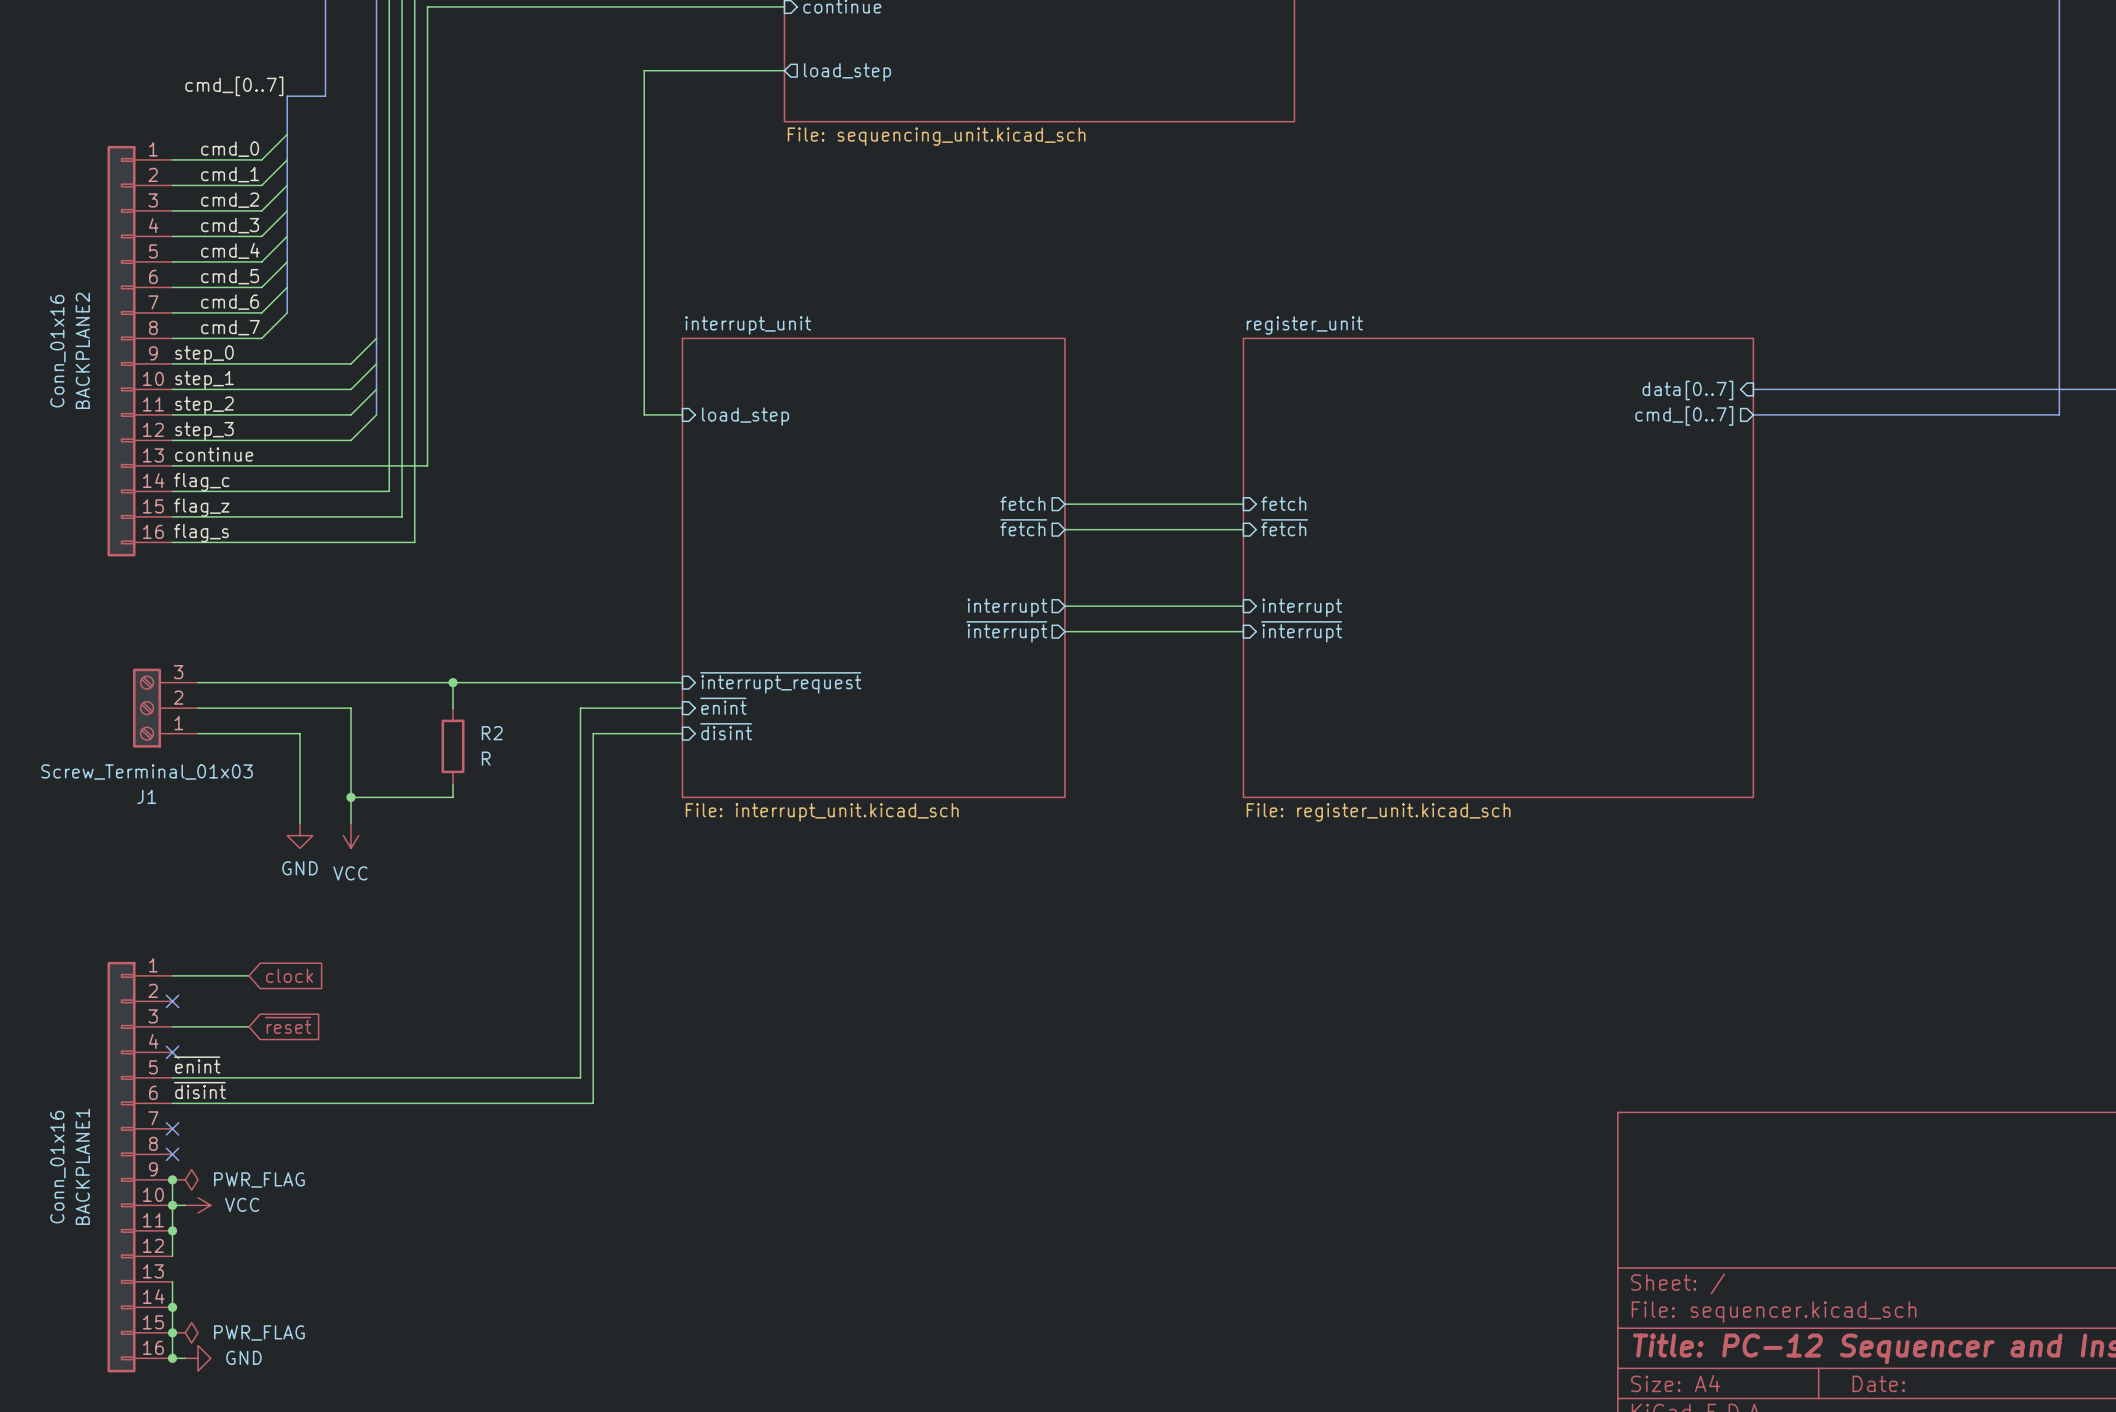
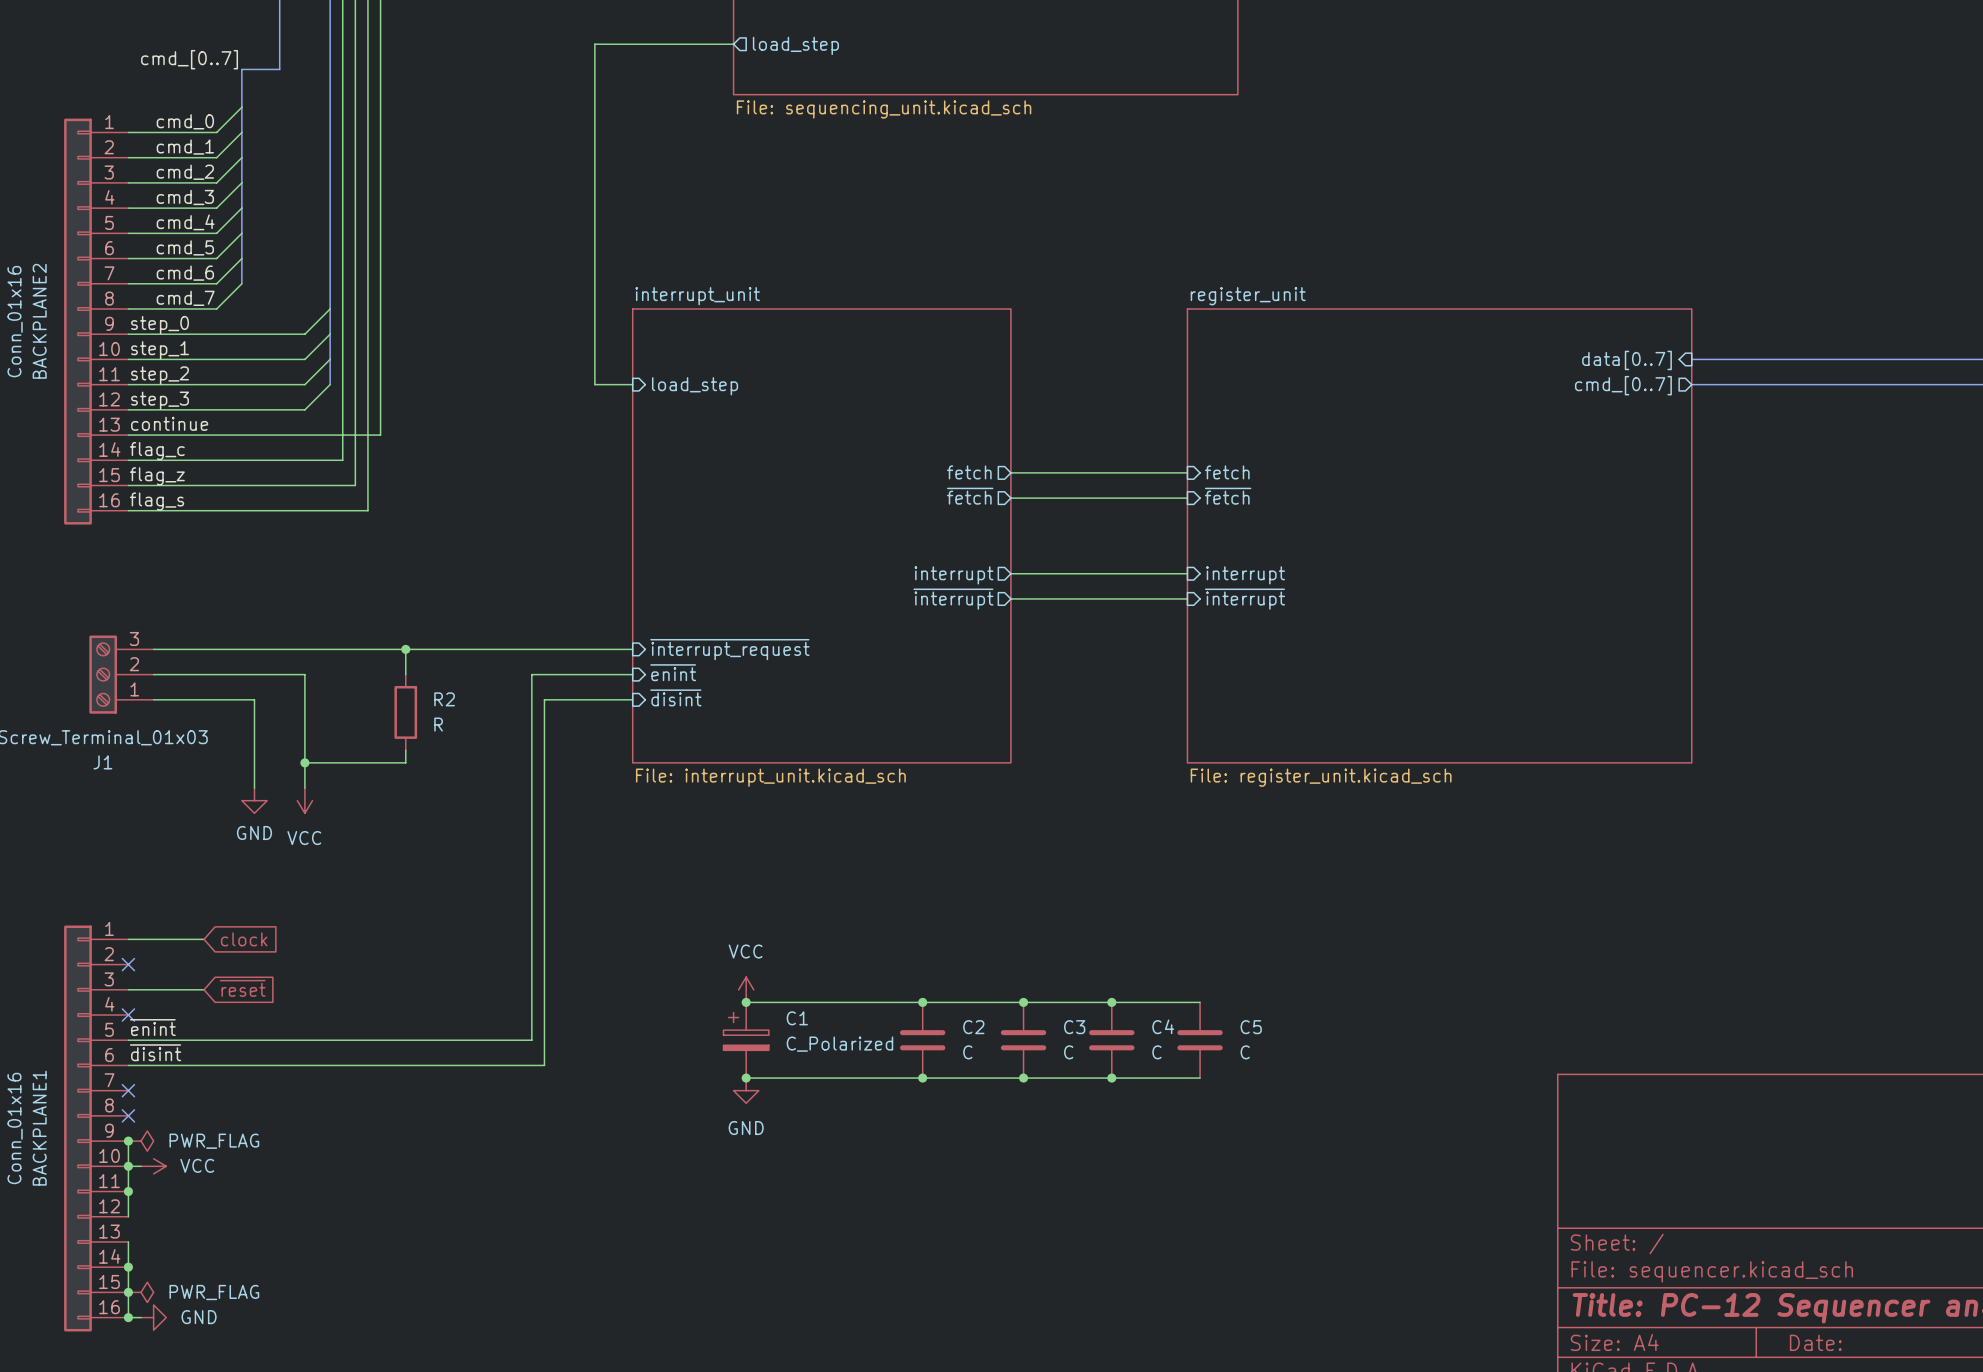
power symbol: none -> VCC (746, 989)
wire: none -> (746, 1002) (1200, 1002)
junction: none -> (746, 1002)
junction: none -> (922, 1002)
junction: none -> (1023, 1002)
junction: none -> (1111, 1002)
C1: none -> C_Polarized (746, 1040)
C2: none -> C (922, 1040)
C3: none -> C (1023, 1040)
C4: none -> C (1111, 1040)
C5: none -> C (1200, 1040)
wire: none -> (746, 1078) (1200, 1078)
junction: none -> (746, 1078)
junction: none -> (922, 1078)
junction: none -> (1023, 1078)
junction: none -> (1111, 1078)
power symbol: none -> GND (746, 1090)

